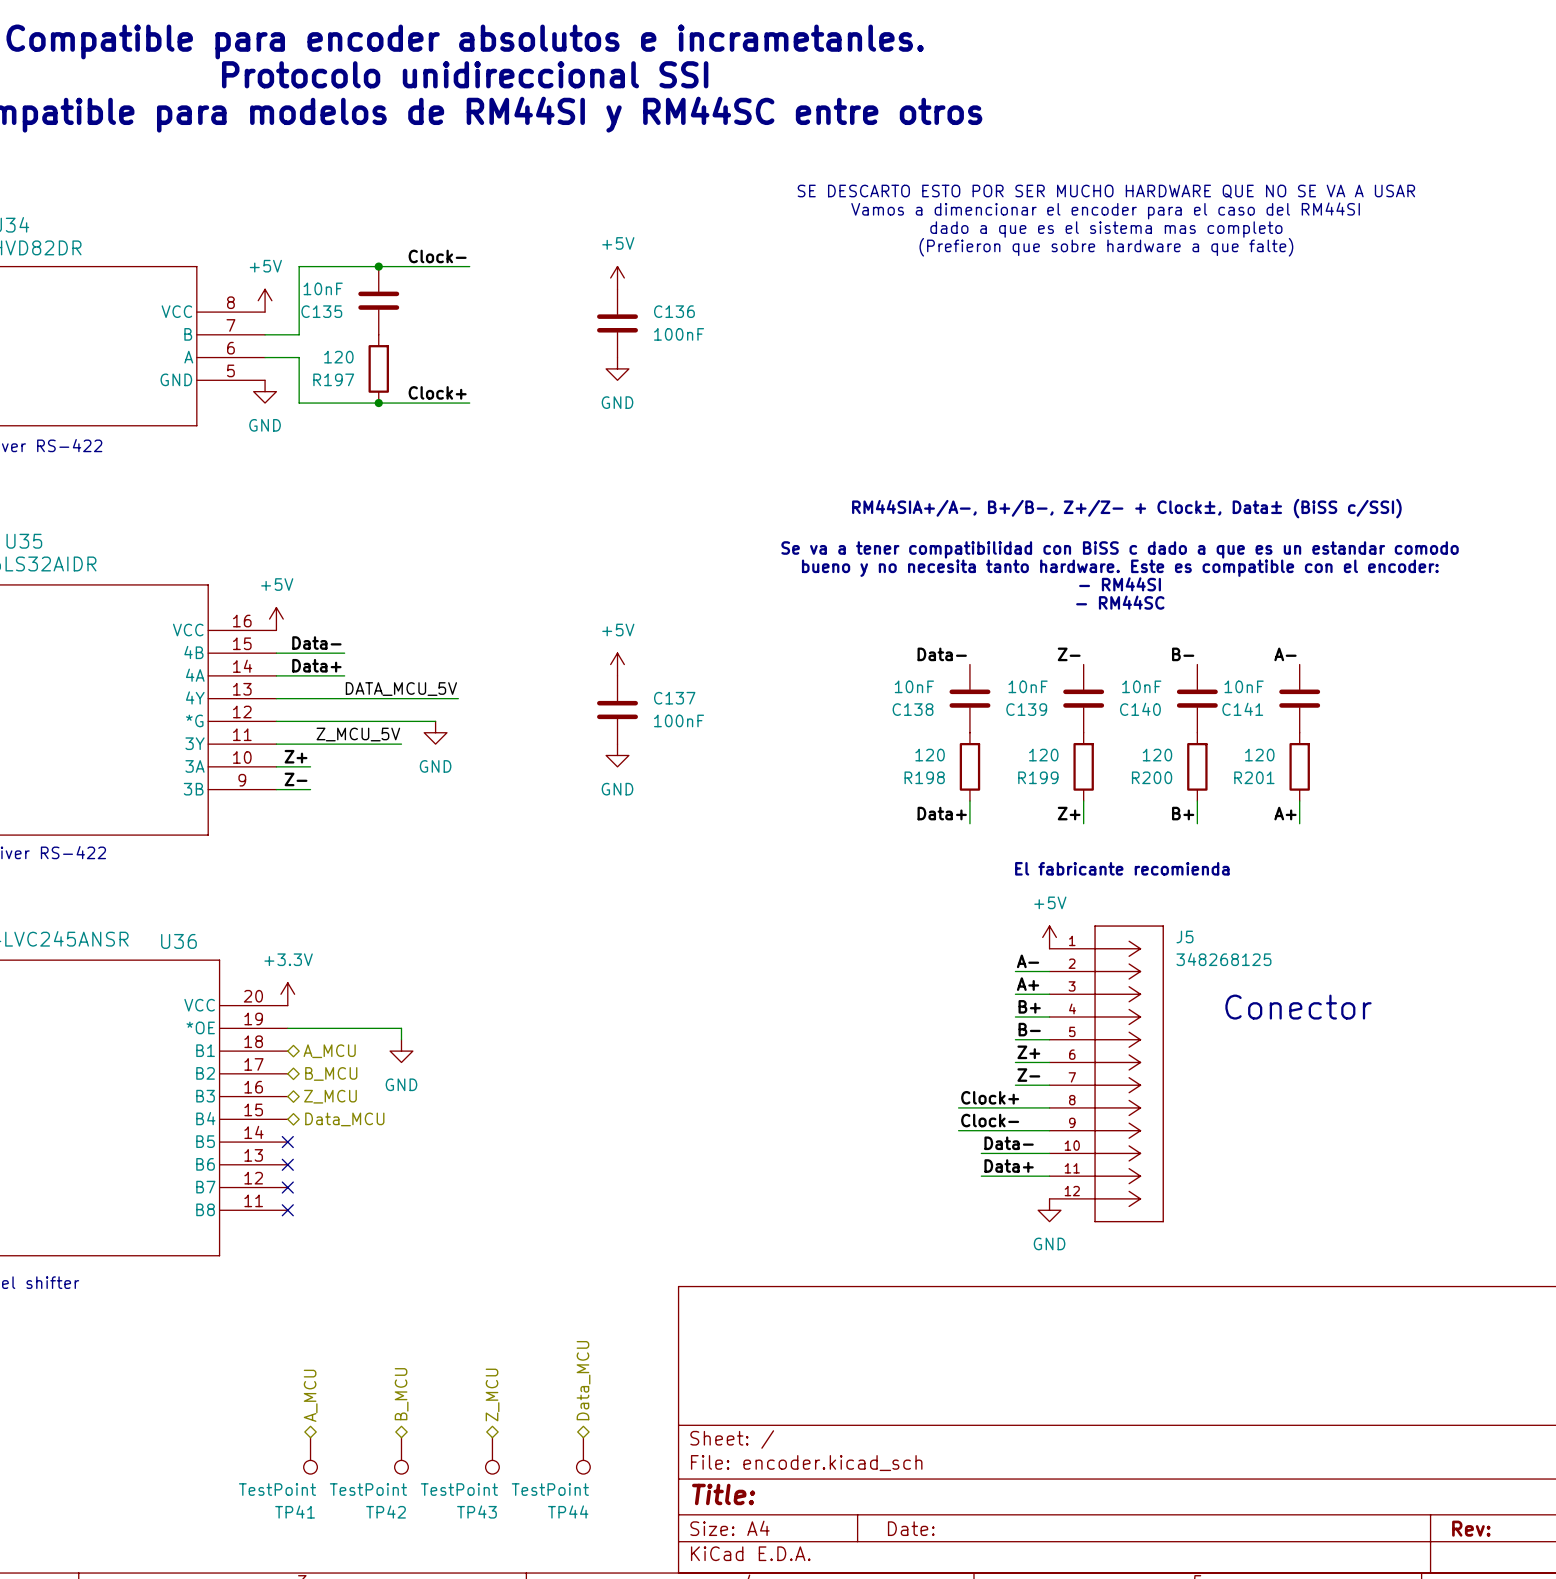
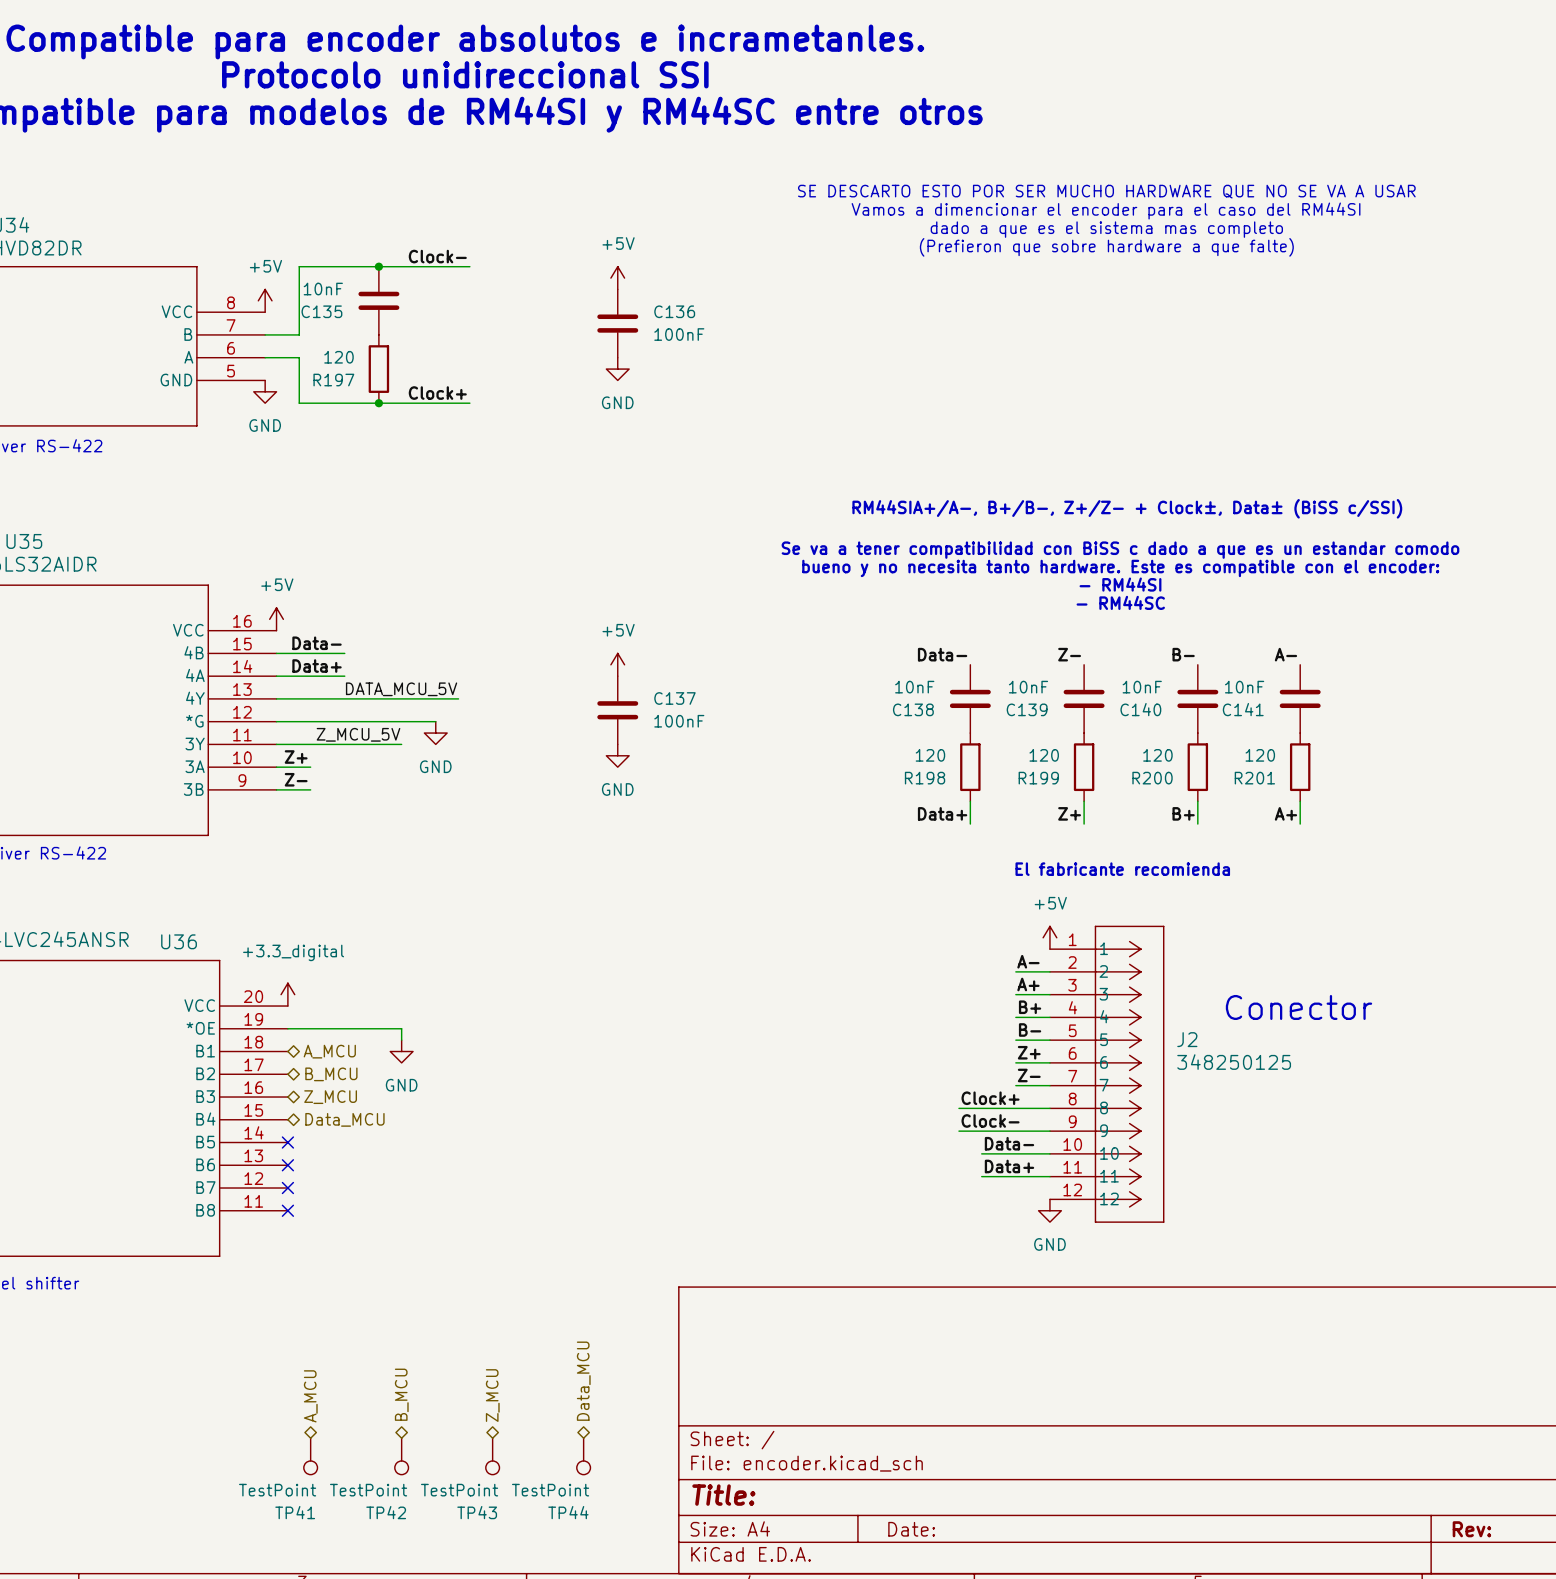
power symbol: +3.3V (287, 994) -> +3.3_digital (287, 994)
J5: 348268125 (1106, 1073) -> none
J2: none -> 348250125 (1107, 1074)

